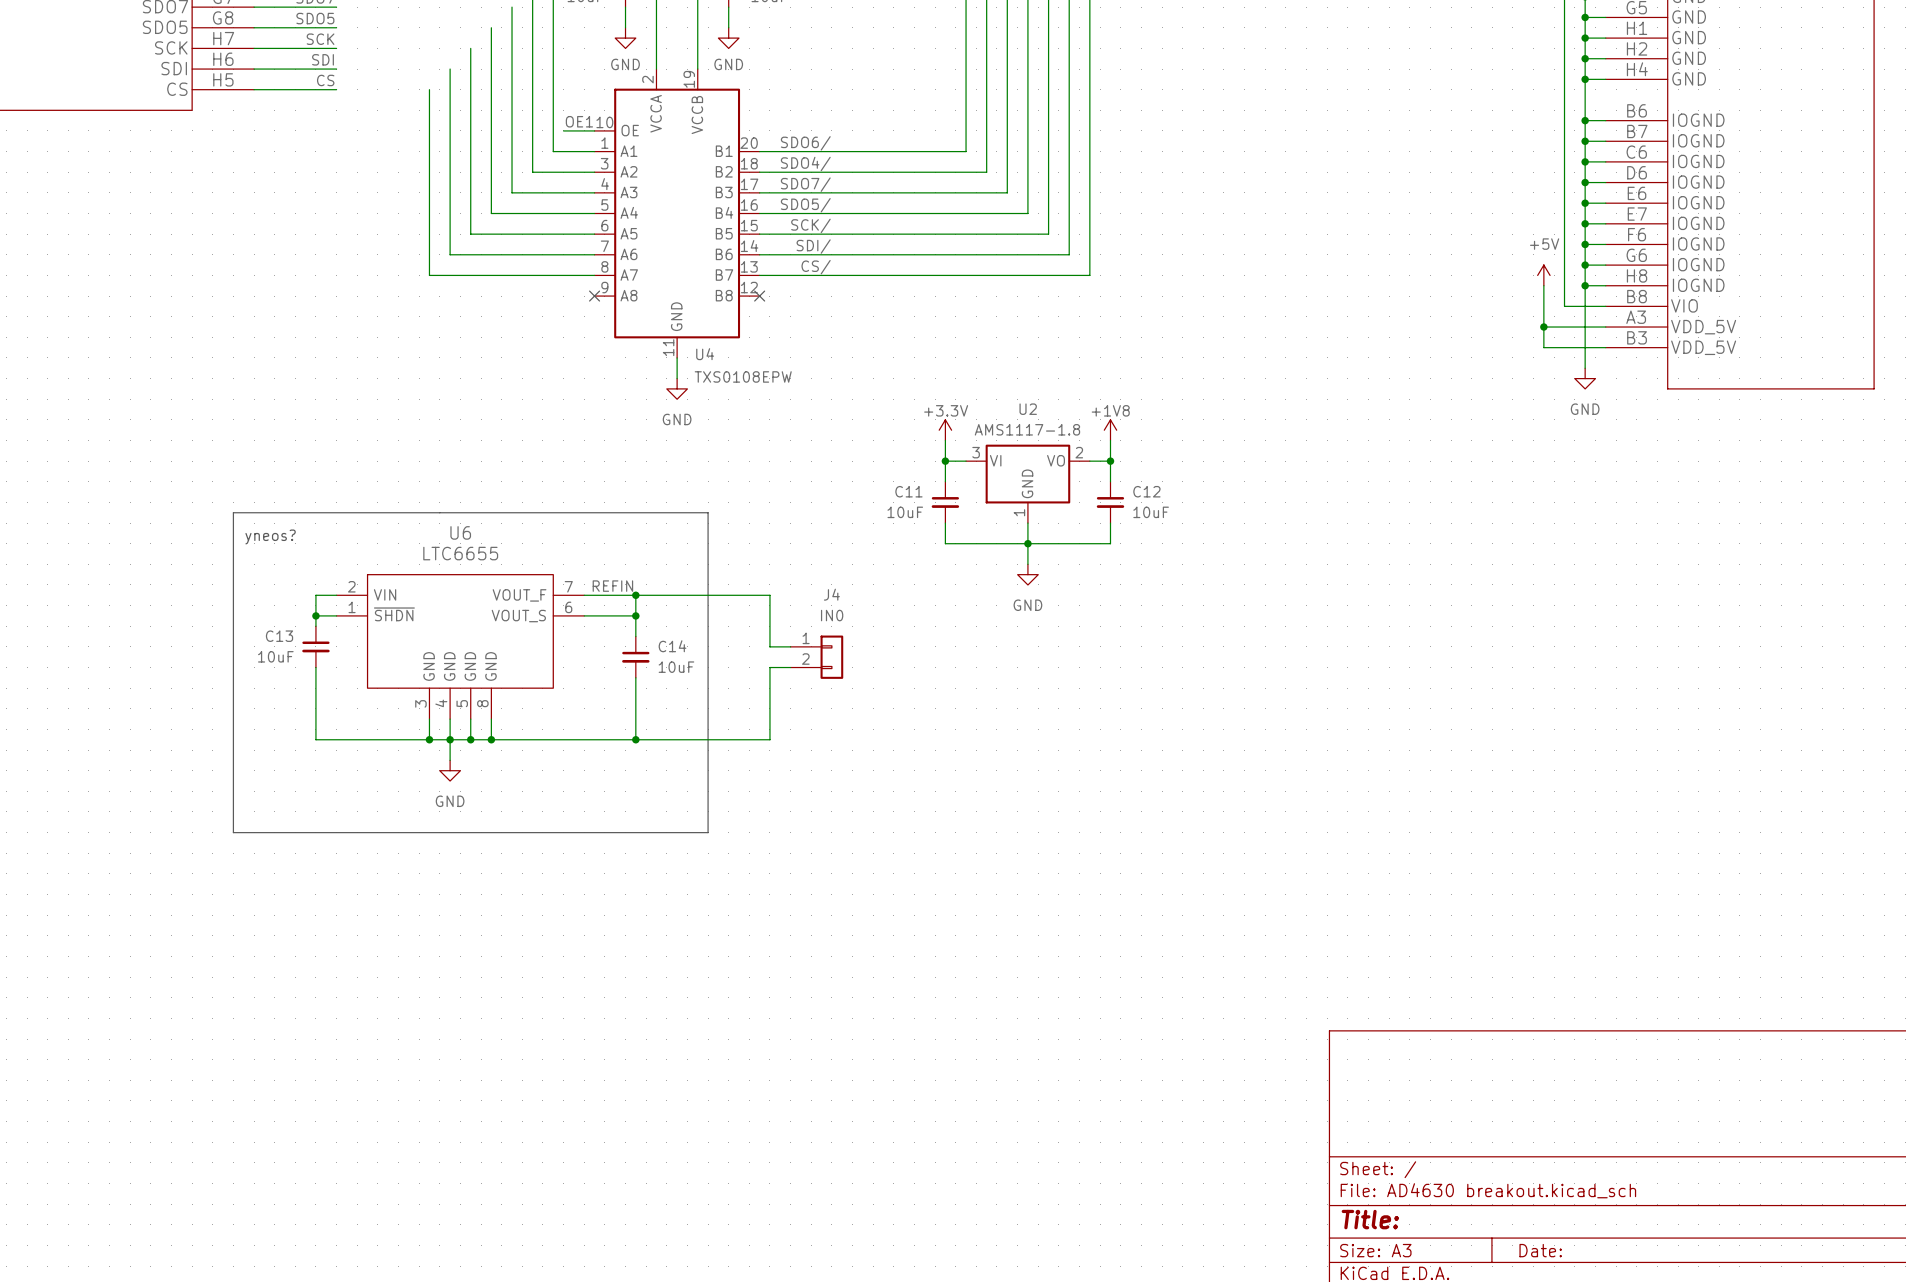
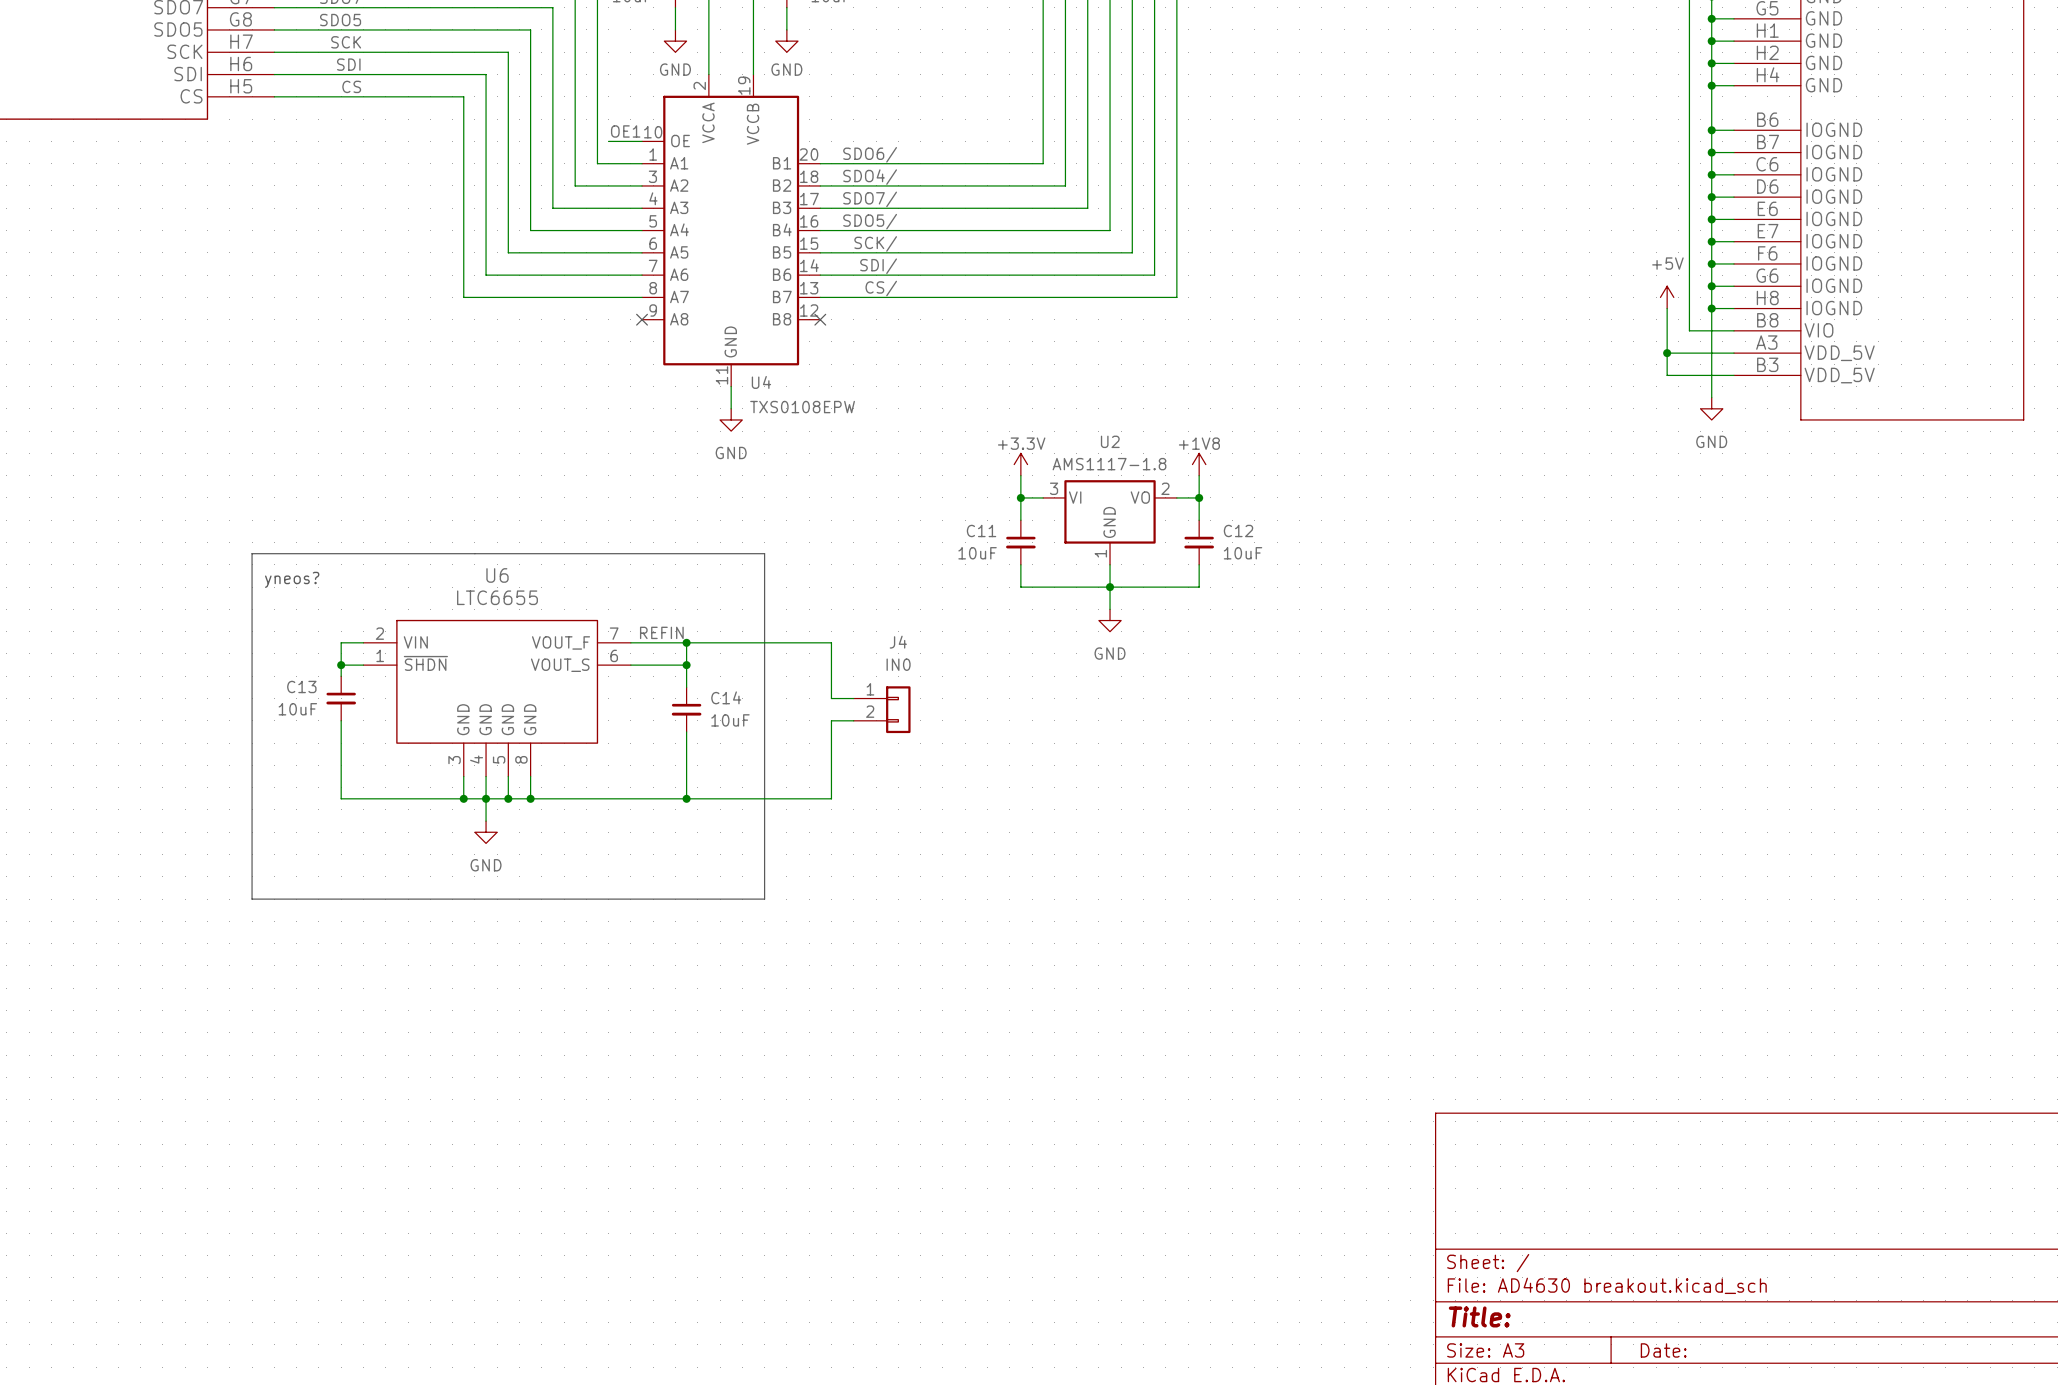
wire: none -> (363, 7) (552, 7)
wire: none -> (363, 29) (530, 29)
wire: none -> (363, 52) (508, 52)
wire: none -> (363, 74) (486, 74)
wire: none -> (363, 96) (463, 96)

